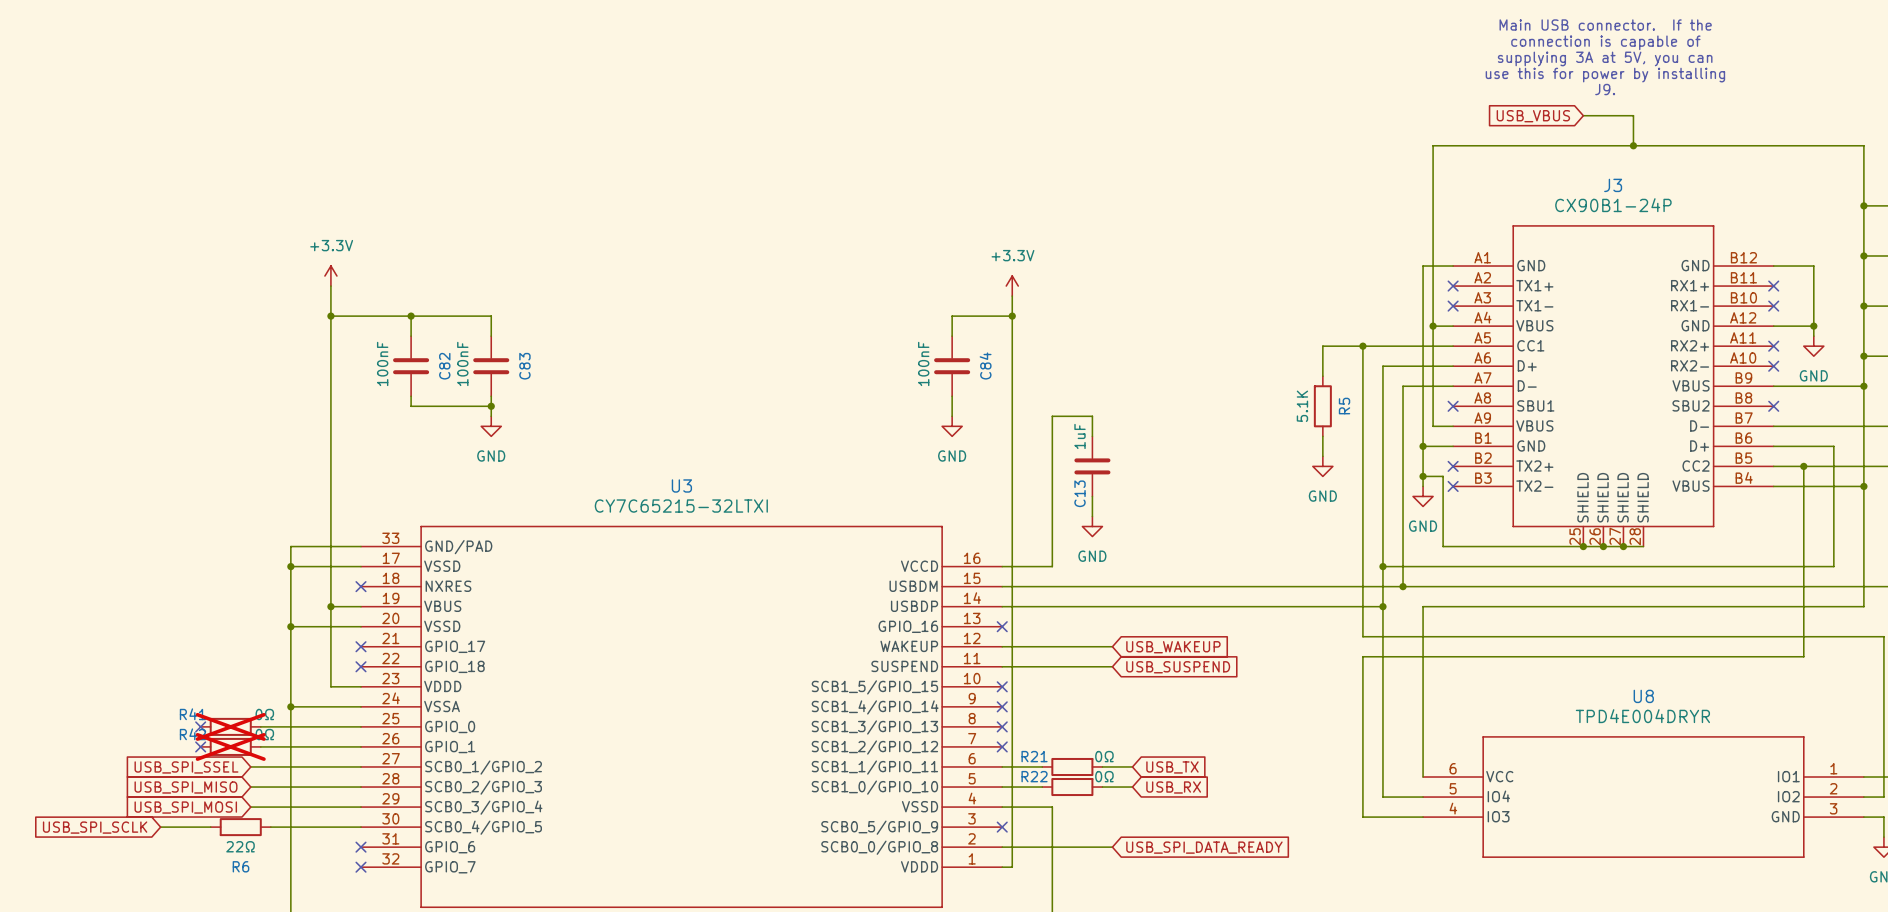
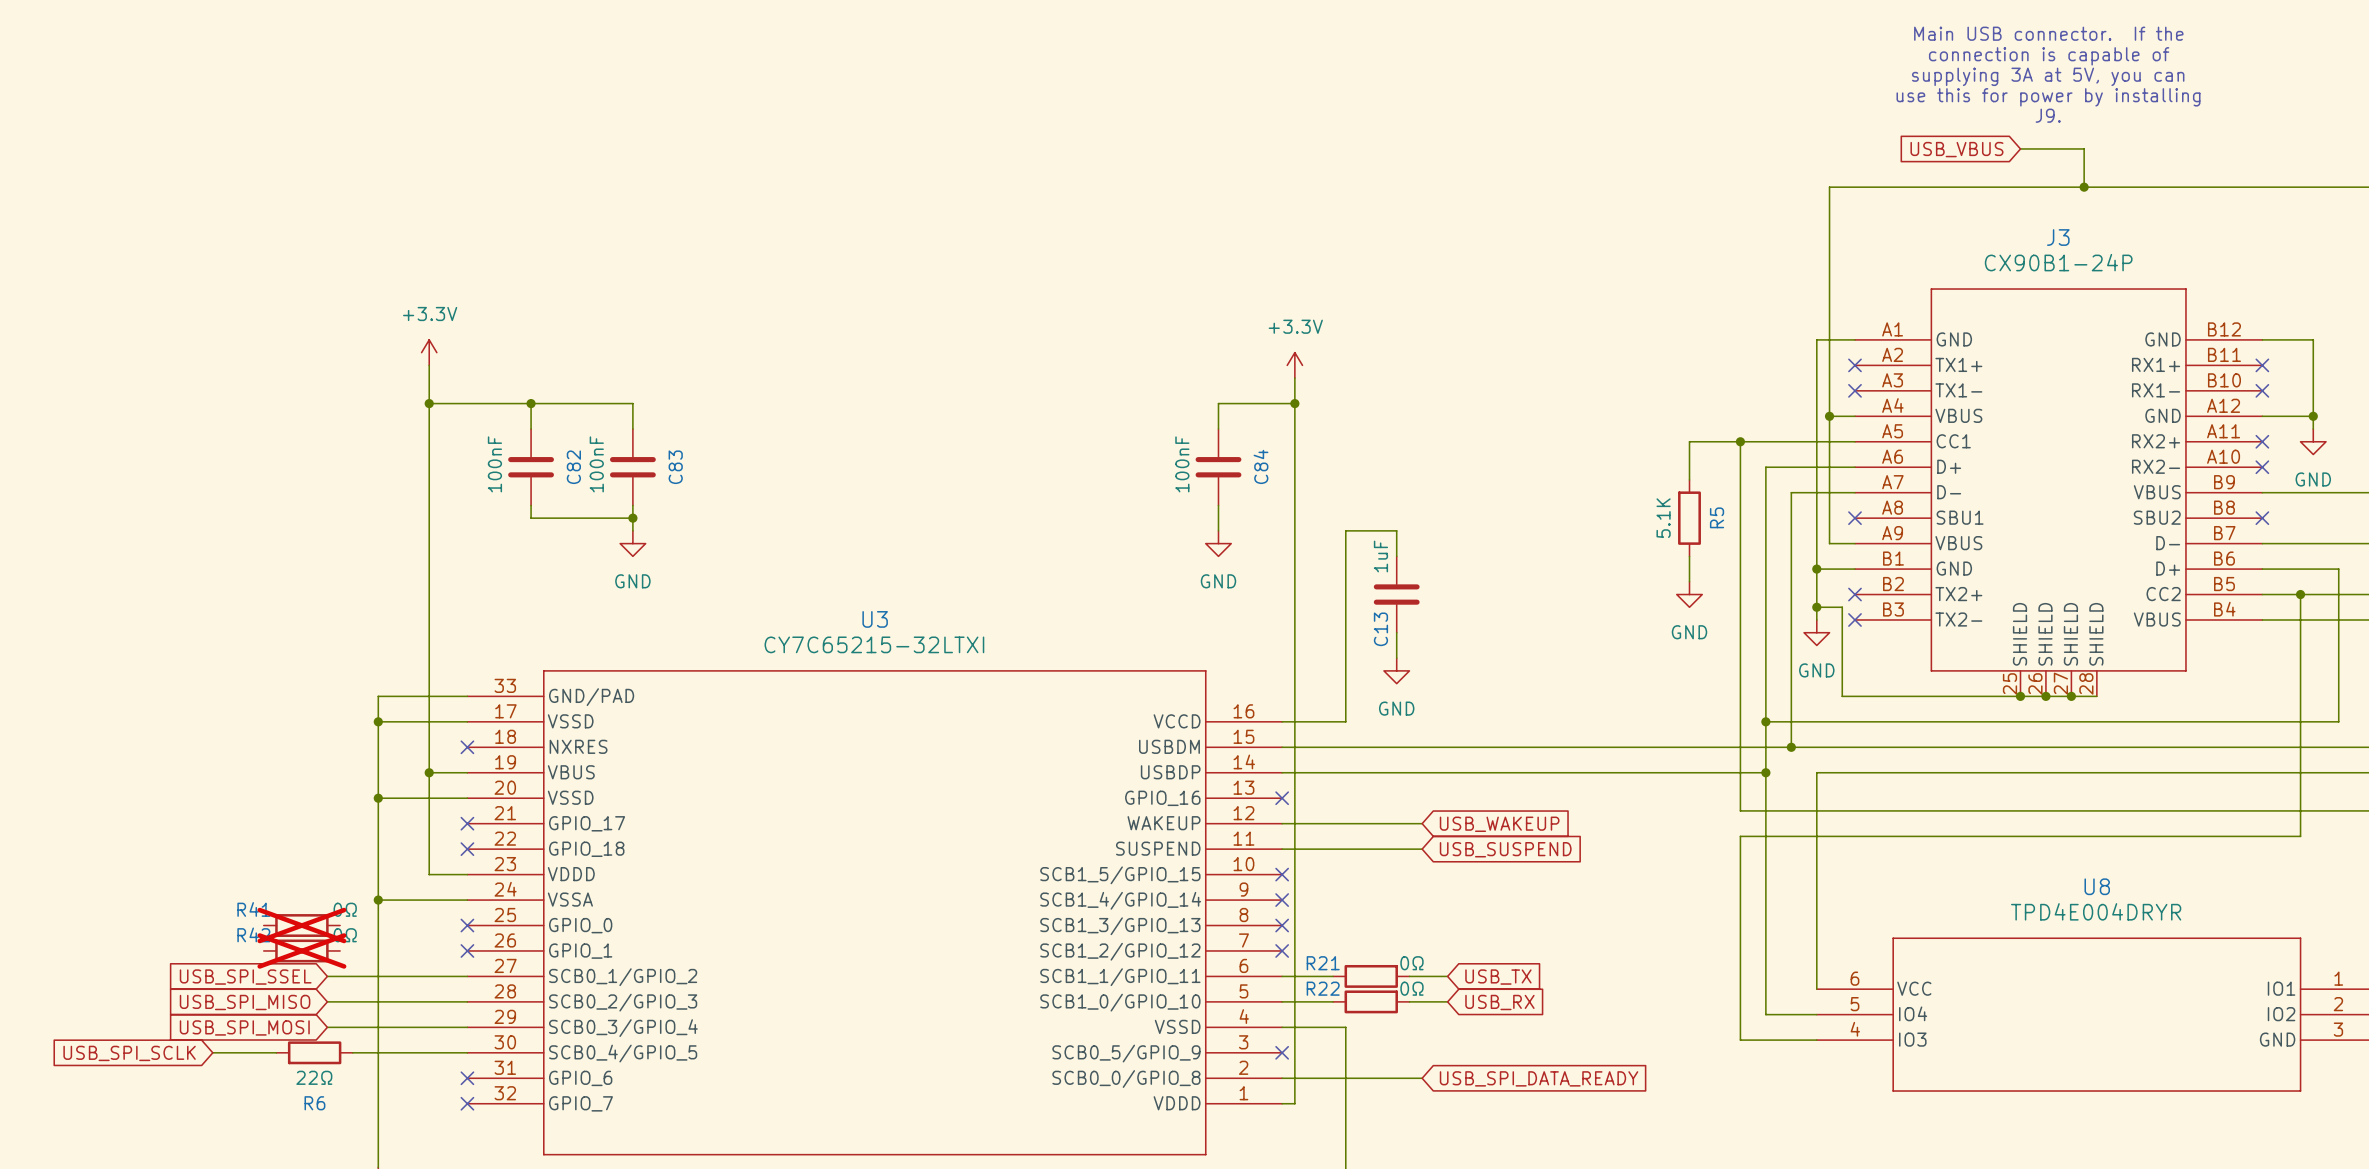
no-connect mark: (200, 726) -> none
wire: (260, 726) (360, 726) -> none
no-connect mark: none -> (467, 925)
no-connect mark: (200, 746) -> none
wire: (260, 746) (360, 746) -> none
no-connect mark: none -> (467, 950)

